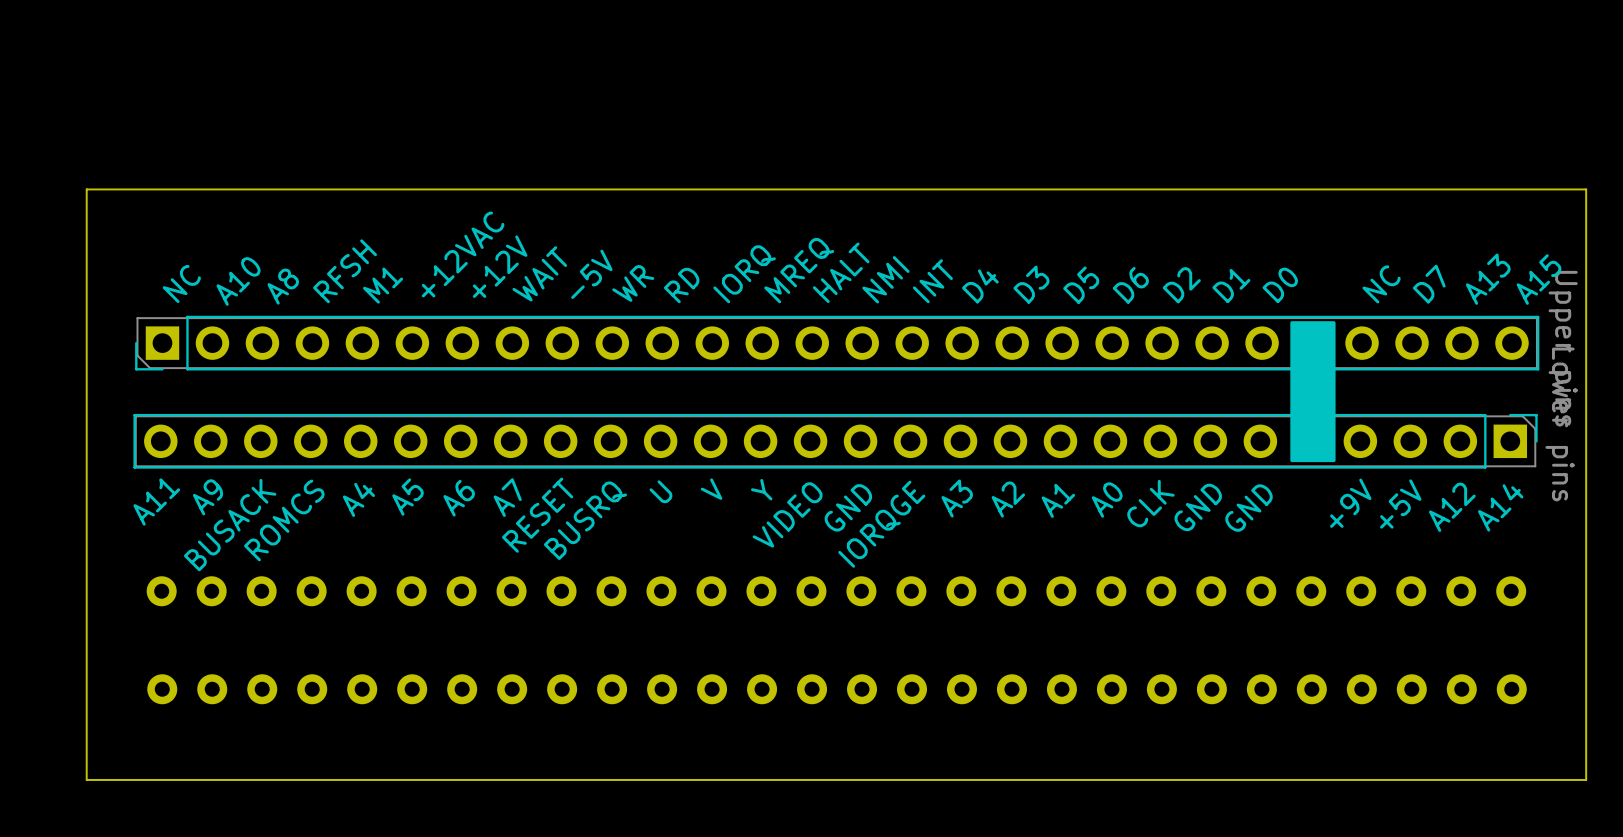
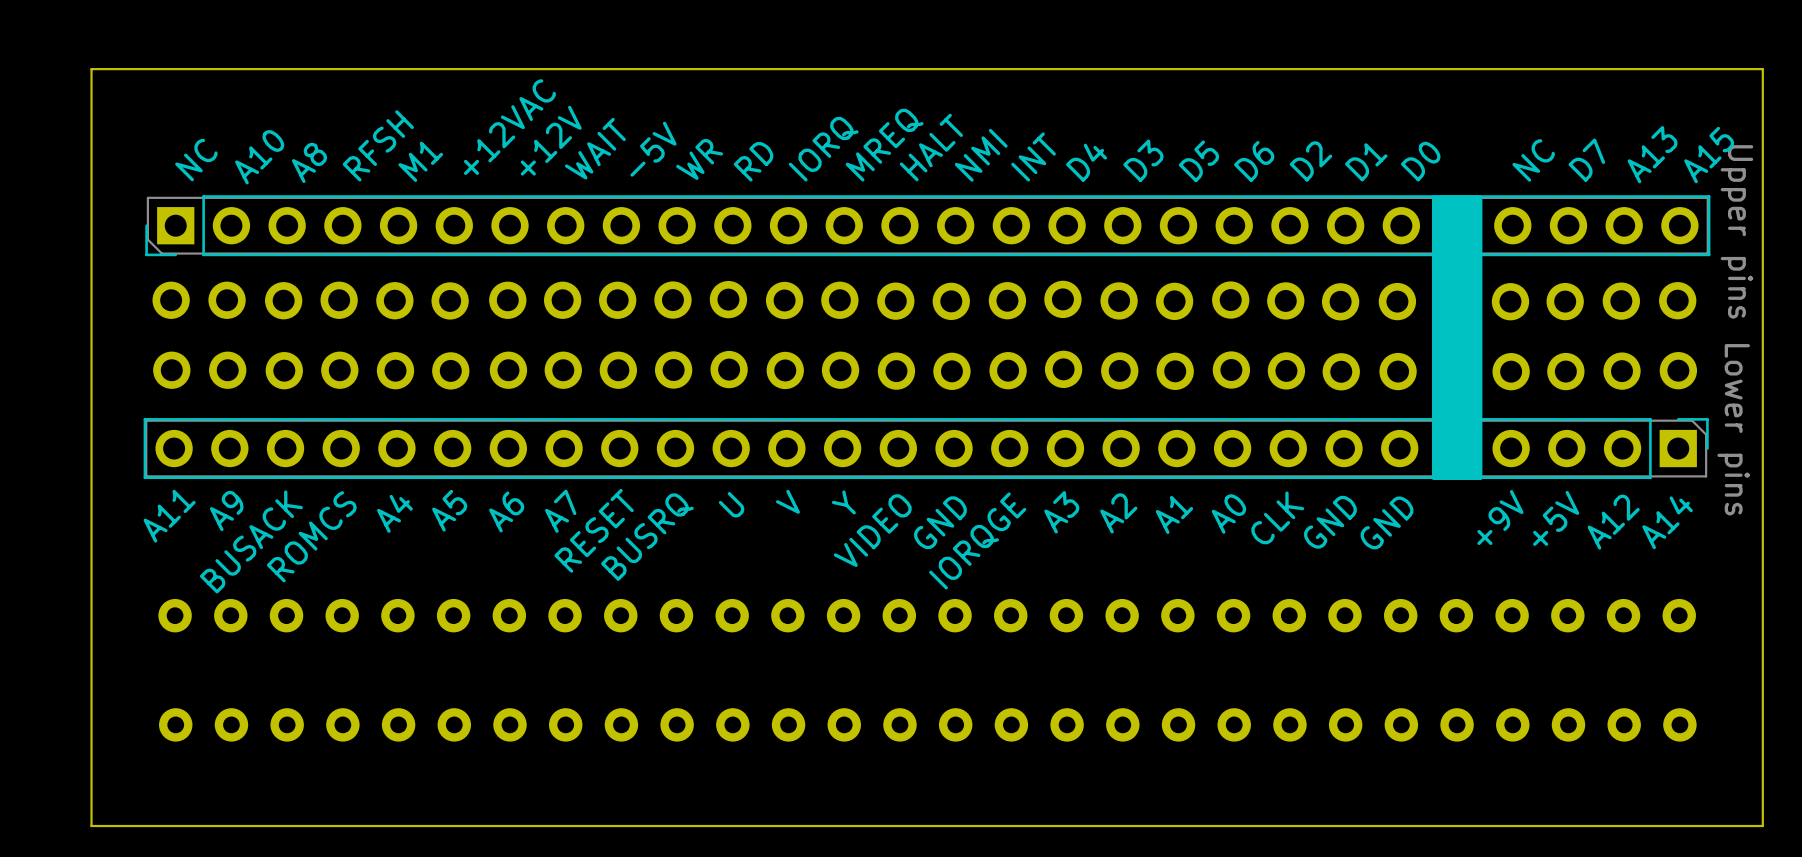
board edge: (1586, 189) (86, 189) -> (1762, 167) (1762, 69) (91, 69) (91, 167)
drawing: none -> [1431, 195, 1483, 481]
text position: +12VAC (463, 254) -> +12VAC (509, 127)
text position: +12V (500, 266) -> +12V (551, 140)
text position: MREQ (799, 270) -> MREQ (884, 145)
text position: RFSH (345, 271) -> RFSH (378, 145)
text position: HALT (841, 272) -> HALT (931, 147)
text position: WAIT (539, 273) -> WAIT (595, 148)
text position: -5V (591, 274) -> -5V (653, 149)
text position: IORQ (744, 274) -> IORQ (823, 149)
text position: NMI (885, 279) -> NMI (981, 155)
text position: A13 (1488, 279) -> A13 (1652, 154)
text position: A15 (1539, 279) -> A15 (1709, 155)
text position: A10 (238, 281) -> A10 (259, 157)
text position: INT (932, 281) -> INT (1033, 156)
text position: WR (633, 283) -> WR (699, 159)
text position: NC (181, 284) -> NC (196, 160)
text position: D3 (1031, 284) -> D3 (1143, 160)
text position: NC (1381, 284) -> NC (1533, 160)
text position: D7 (1429, 284) -> D7 (1586, 160)
text position: M1 (383, 285) -> M1 (420, 161)
text position: RD (681, 285) -> RD (753, 161)
text position: D5 (1081, 285) -> D5 (1198, 161)
text position: D6 (1130, 285) -> D6 (1254, 161)
text position: D2 (1181, 285) -> D2 (1311, 161)
text position: D0 (1280, 285) -> D0 (1420, 161)
text position: A8 (283, 286) -> A8 (309, 162)
text position: D4 (980, 286) -> D4 (1086, 162)
text position: D1 (1231, 286) -> D1 (1366, 162)
part: none -> (728, 299)
part: none -> (1062, 299)
part: none -> (171, 300)
part: none -> (227, 300)
part: none -> (283, 300)
part: none -> (339, 300)
part: none -> (394, 300)
part: none -> (450, 300)
part: none -> (507, 300)
part: none -> (562, 300)
part: none -> (617, 300)
part: none -> (672, 300)
part: none -> (784, 300)
part: none -> (839, 300)
part: none -> (1007, 300)
part: none -> (1119, 300)
part: none -> (1230, 300)
part: none -> (1285, 300)
part: none -> (1677, 300)
part: none -> (895, 301)
part: none -> (951, 301)
part: none -> (1174, 301)
part: none -> (1340, 301)
part: none -> (1397, 301)
part: none -> (1510, 301)
part: none -> (1565, 301)
part: none -> (1621, 301)
drawing: [1290, 321, 1336, 463] -> none
part position: (837, 343) -> (927, 225)
part: none -> (673, 370)
part: none -> (729, 369)
part: none -> (1063, 369)
part: none -> (1231, 370)
part: none -> (171, 370)
part: none -> (227, 370)
part: none -> (284, 370)
part: none -> (339, 370)
part: none -> (395, 370)
part: none -> (450, 370)
part: none -> (508, 370)
part: none -> (563, 370)
part: none -> (618, 370)
part: none -> (785, 370)
part: none -> (840, 370)
part: none -> (896, 371)
part: none -> (1008, 370)
part: none -> (1119, 370)
part: none -> (1286, 370)
part: none -> (1622, 371)
part: none -> (1678, 370)
part: none -> (951, 371)
part: none -> (1175, 371)
part: none -> (1341, 371)
part: none -> (1398, 371)
part: none -> (1511, 371)
part: none -> (1565, 371)

